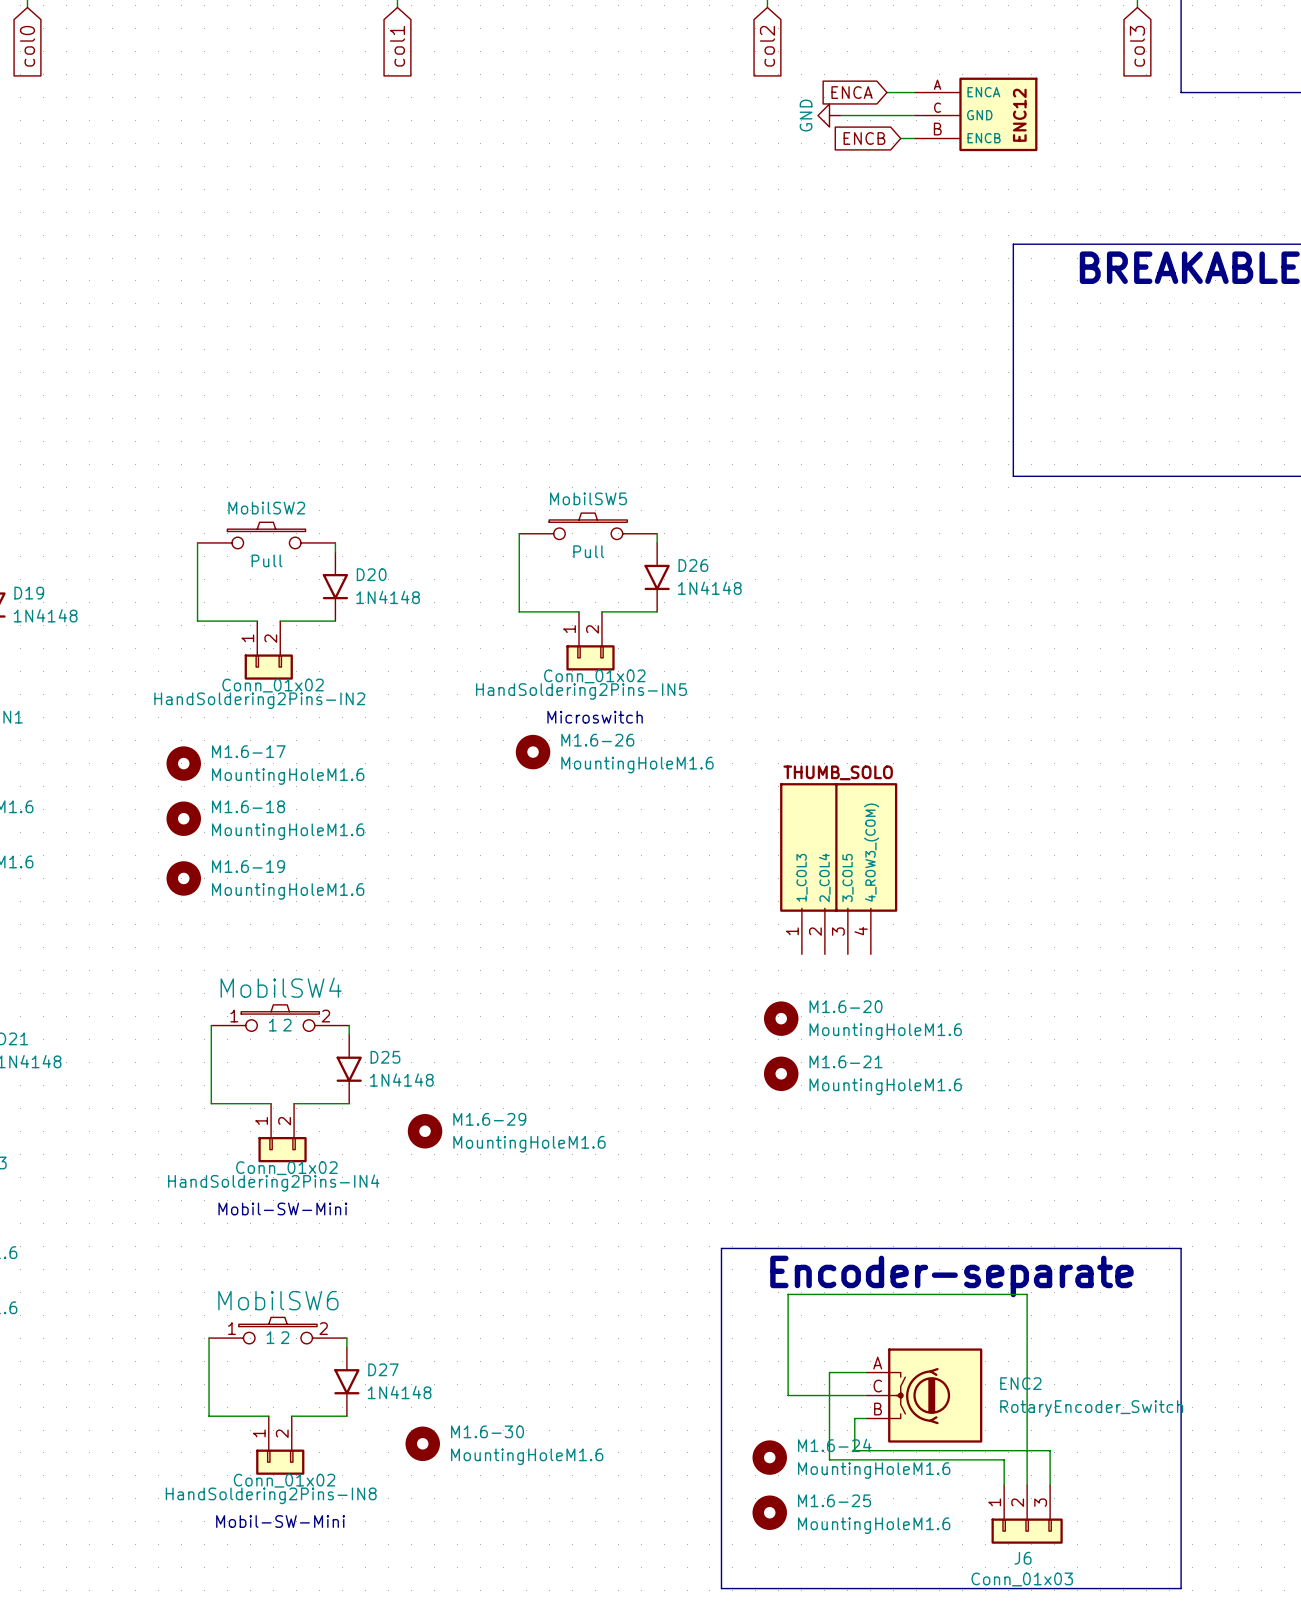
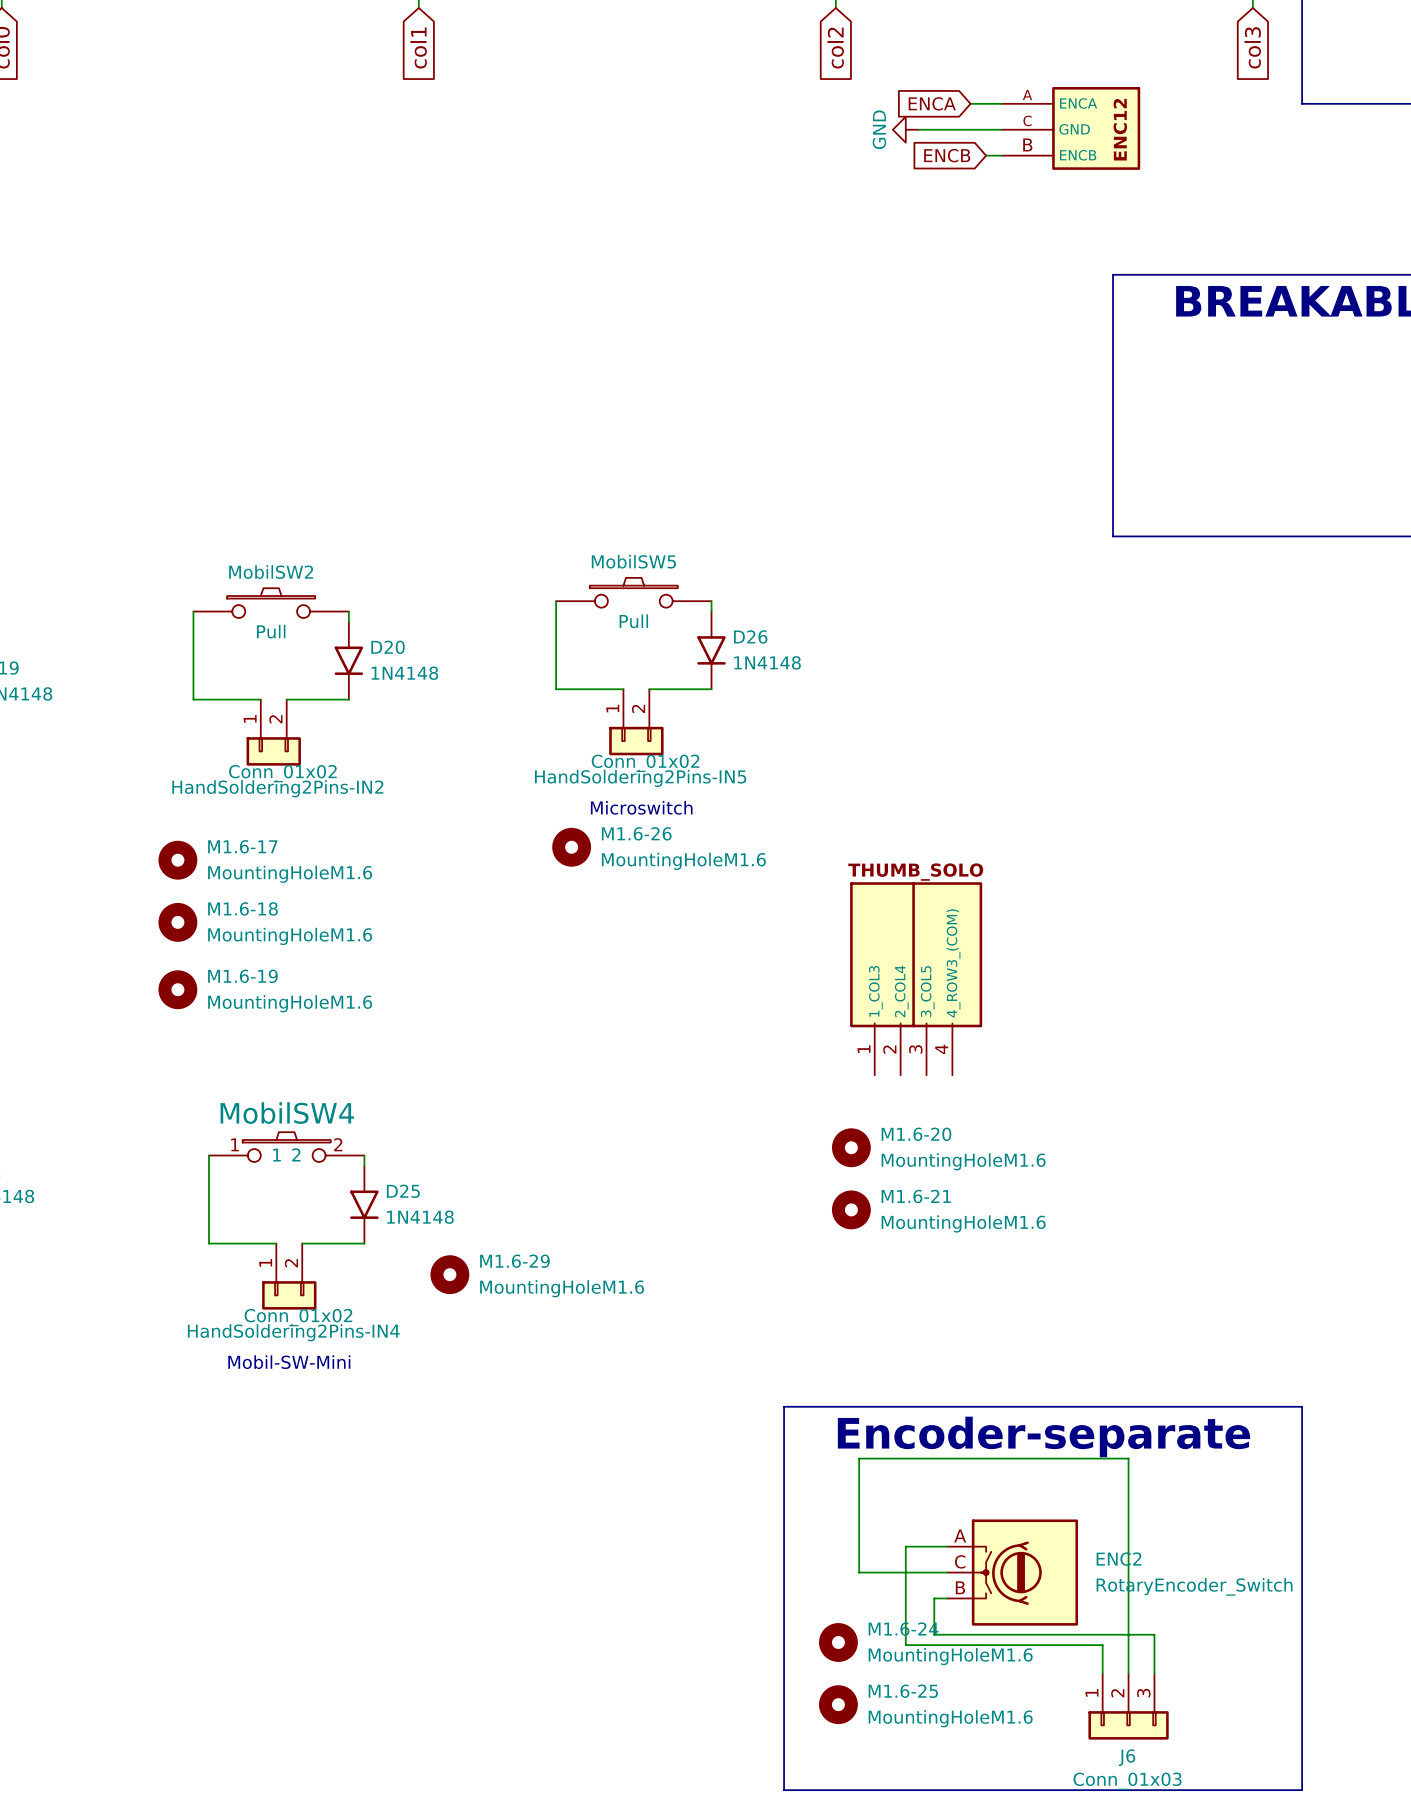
MobilSW6: (277, 1330) -> none
wire: (209, 1338) (209, 1416) (268, 1416) -> none
wire: (346, 1338) (346, 1347) -> none
D27: 1N4148 (346, 1381) -> none
wire: (291, 1416) (346, 1416) -> none
M1.6-30: MountingHoleM1.6 (422, 1443) -> none
HandSoldering2Pins-IN8: Conn_01x02 (280, 1445) -> none
text: Mobil-SW-Mini (280, 1521) -> none

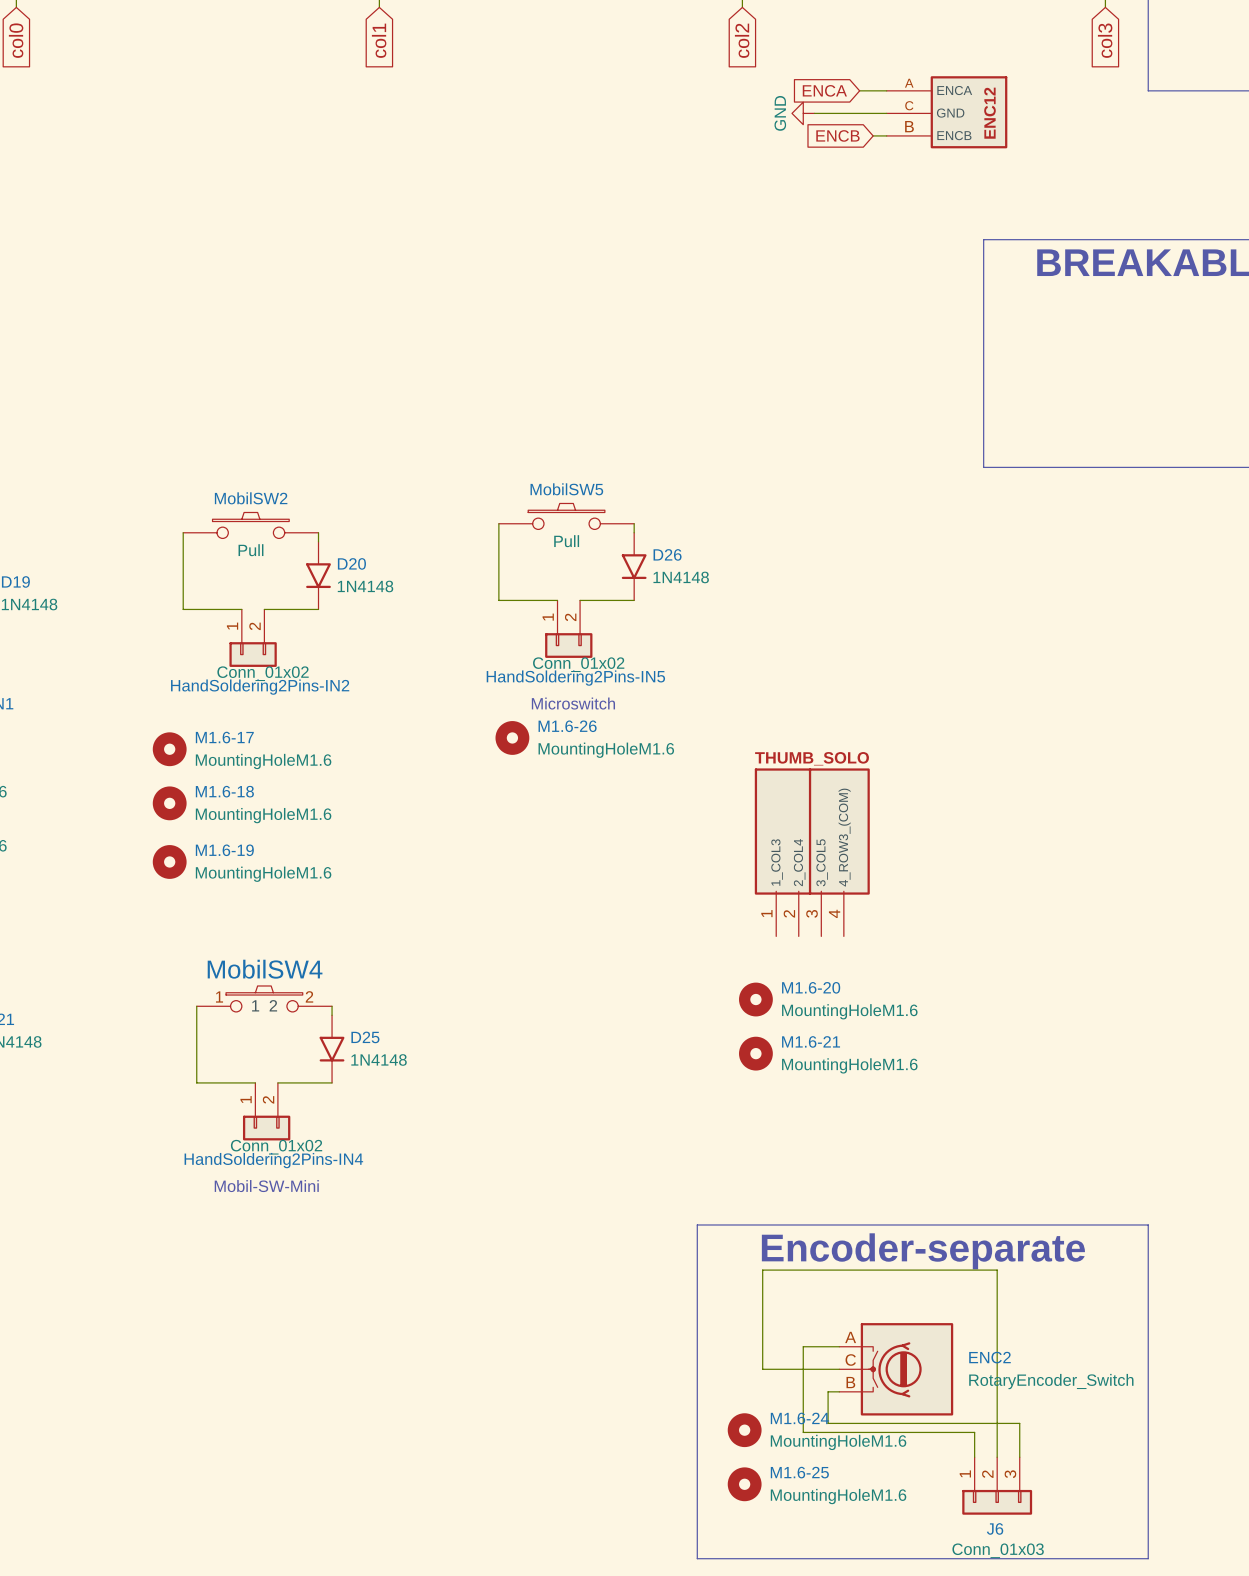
M1.6-29: MountingHoleM1.6 (449, 1274) -> none

